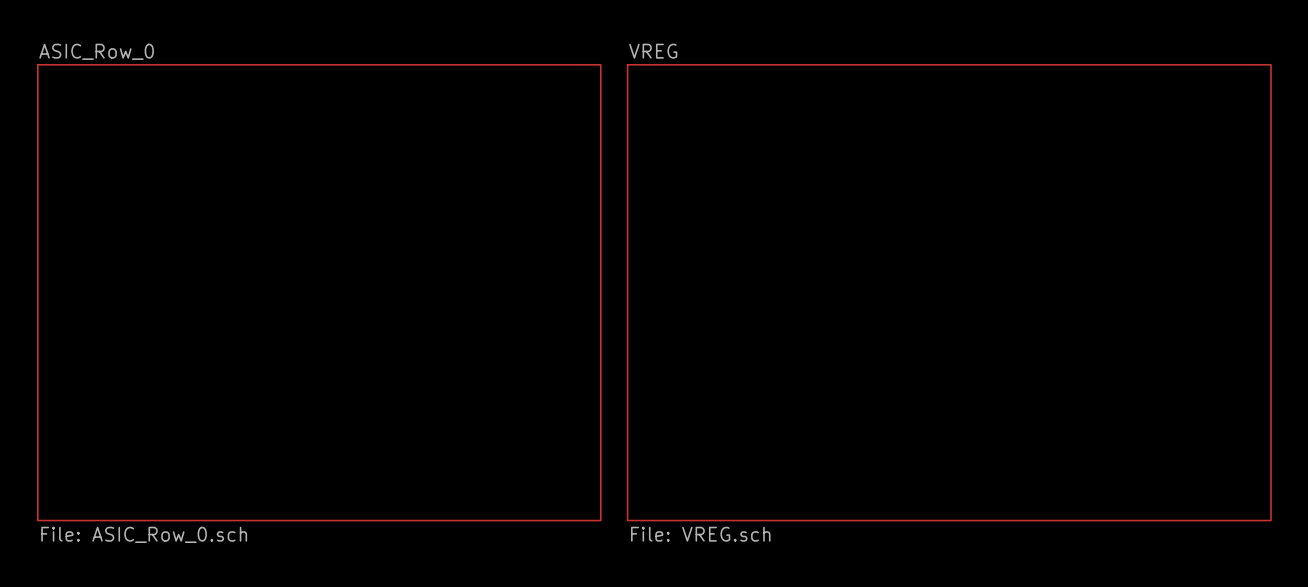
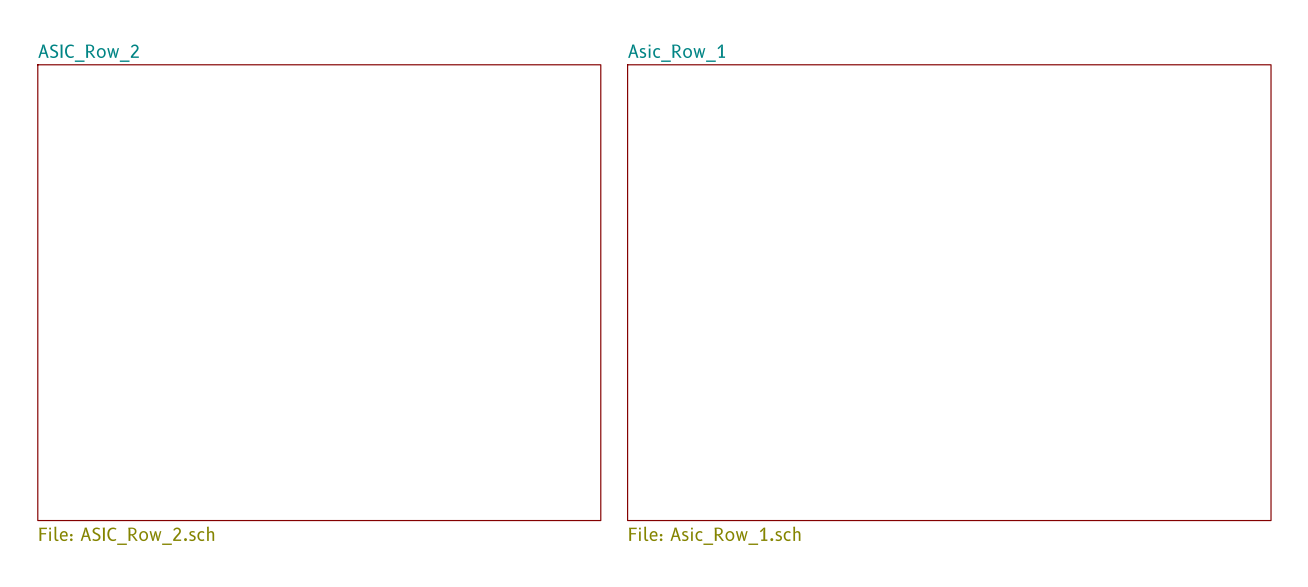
sheet ASIC_Row_0 name: ASIC_Row_0 (96, 51) -> ASIC_Row_2 (88, 53)
sheet VREG name: VREG (653, 51) -> Asic_Row_1 (676, 53)
sheet ASIC_Row_0 value: File: ASIC_Row_0.sch (144, 534) -> File: ASIC_Row_2.sch (126, 535)
sheet VREG value: File: VREG.sch (700, 534) -> File: Asic_Row_1.sch (714, 535)

